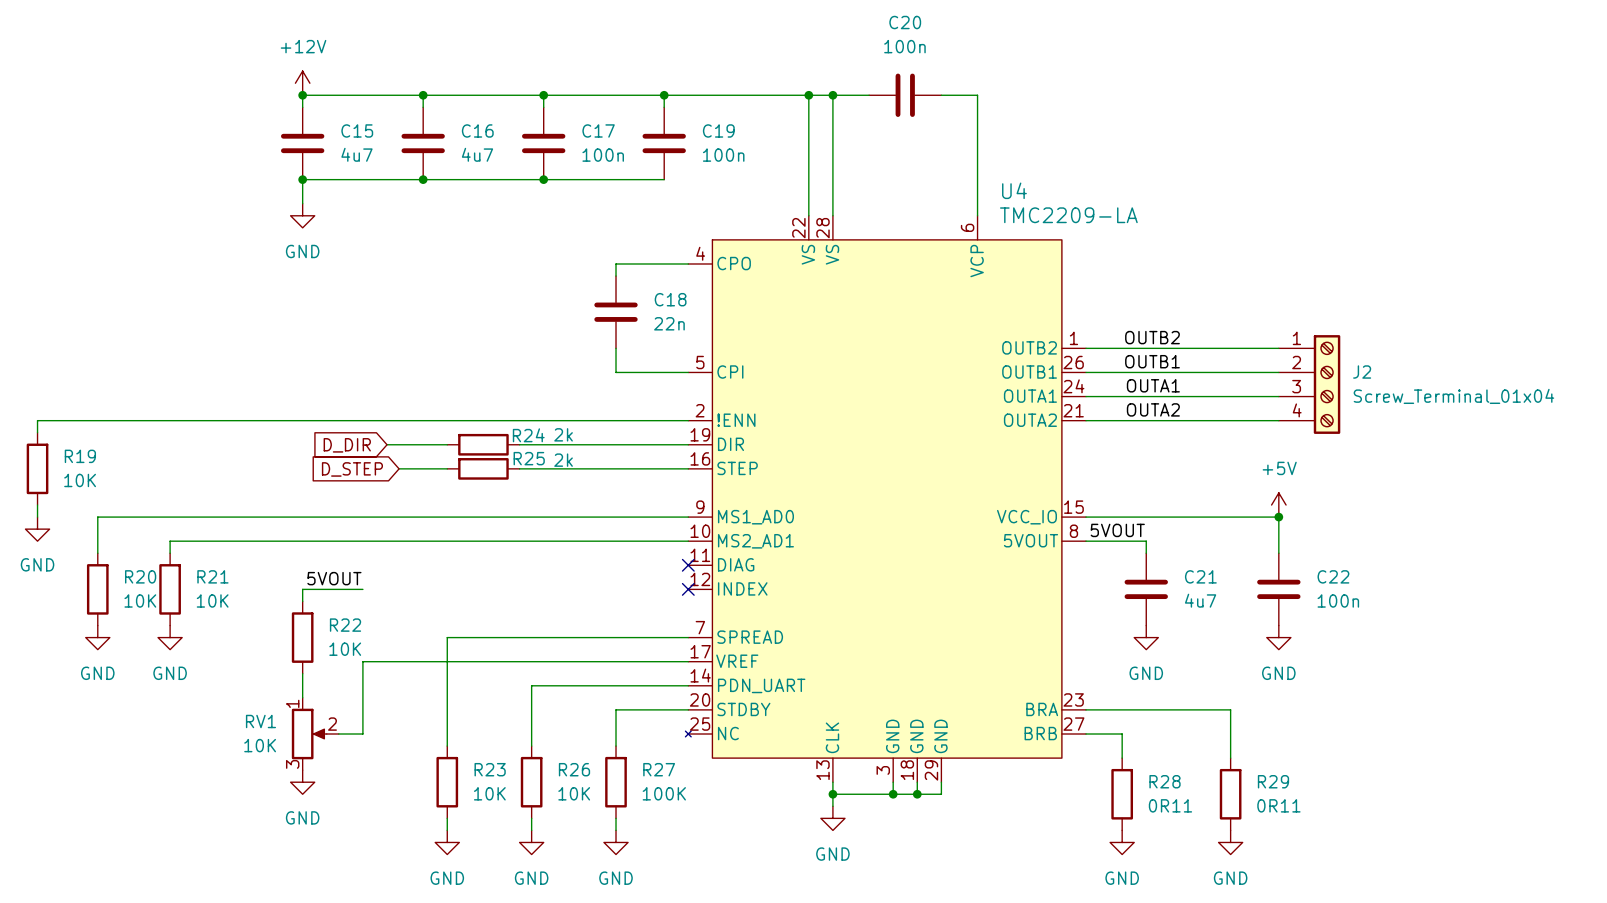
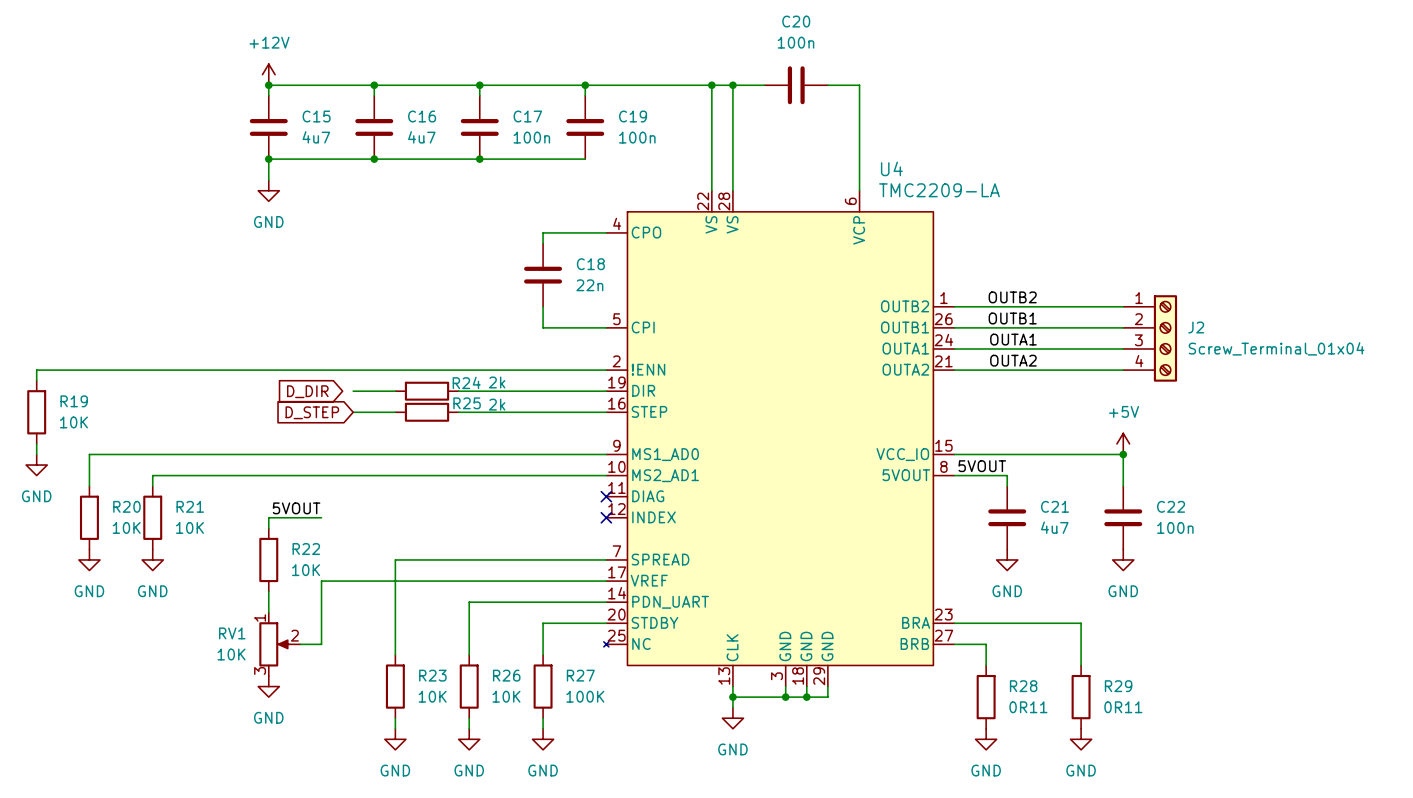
wire: (387, 444) (399, 444) -> none

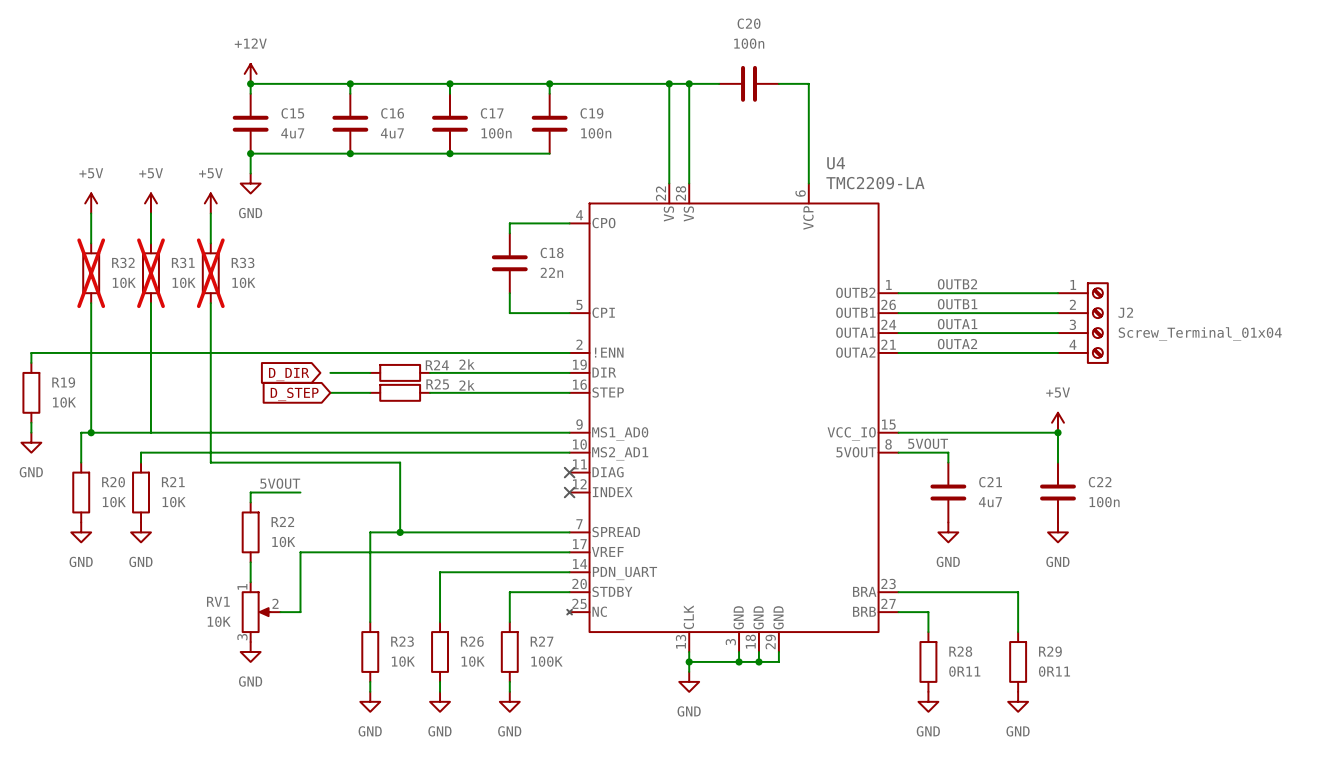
power symbol: none -> +5V (91, 203)
power symbol: none -> +5V (150, 203)
power symbol: none -> +5V (210, 203)
wire: none -> (91, 213) (91, 243)
wire: none -> (150, 213) (150, 243)
wire: none -> (210, 213) (210, 243)
R32: none -> 10K (91, 273)
R31: none -> 10K (150, 273)
R33: none -> 10K (210, 273)
wire: none -> (91, 303) (91, 432)
wire: none -> (150, 303) (150, 432)
wire: none -> (210, 303) (210, 462) (400, 462) (400, 532)
junction: none -> (91, 432)
junction: none -> (400, 532)

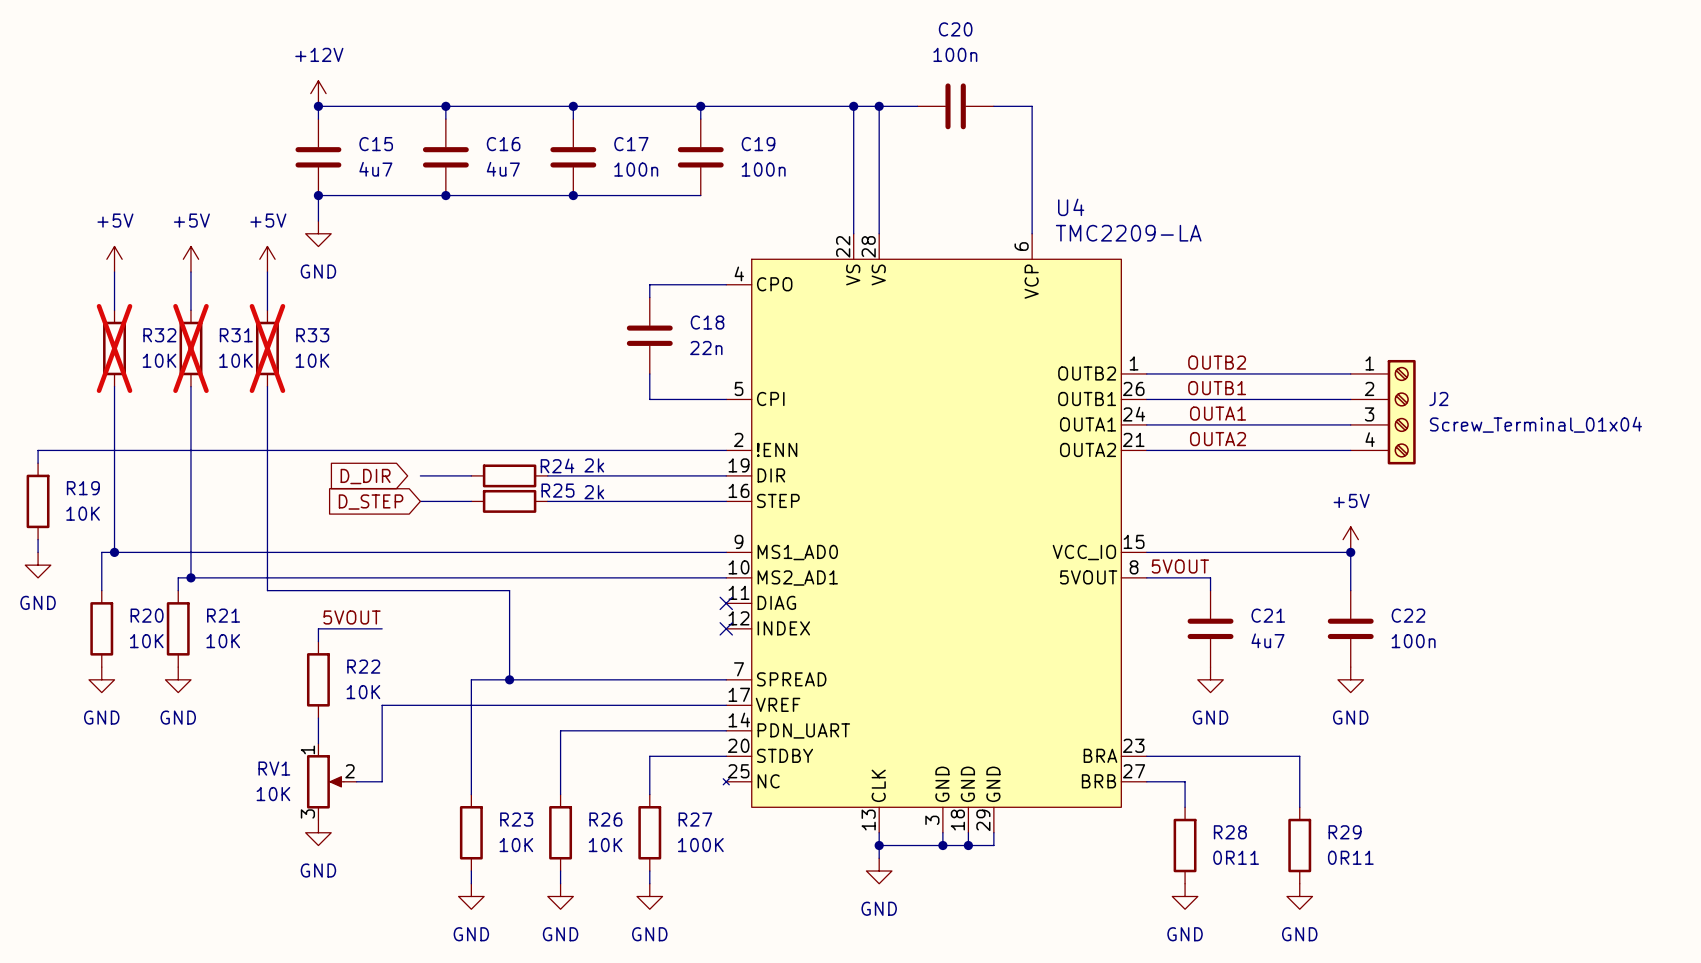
wire: none -> (190, 552) (190, 577)
junction: none -> (190, 577)

